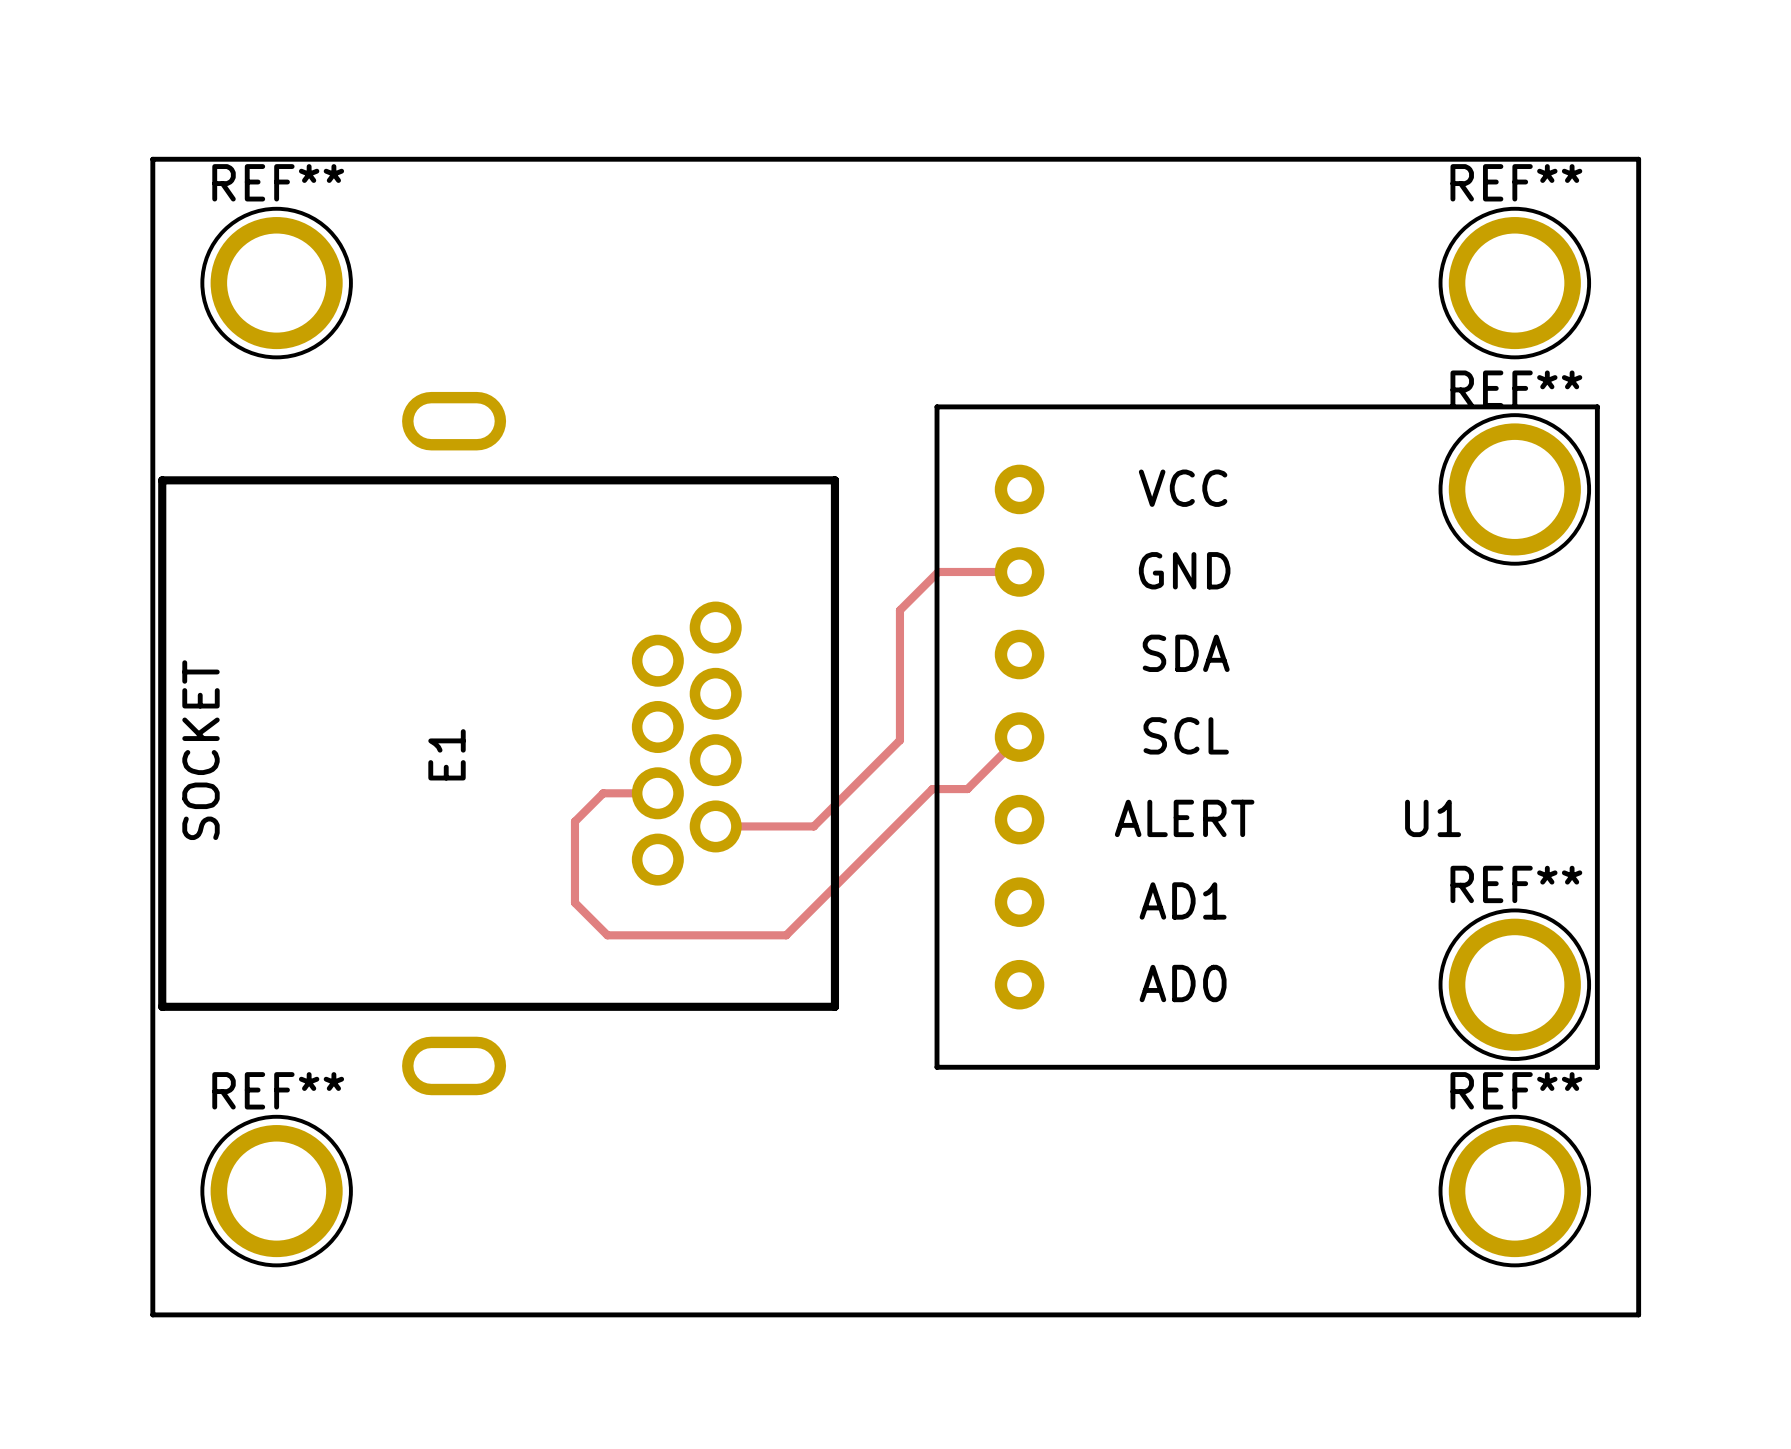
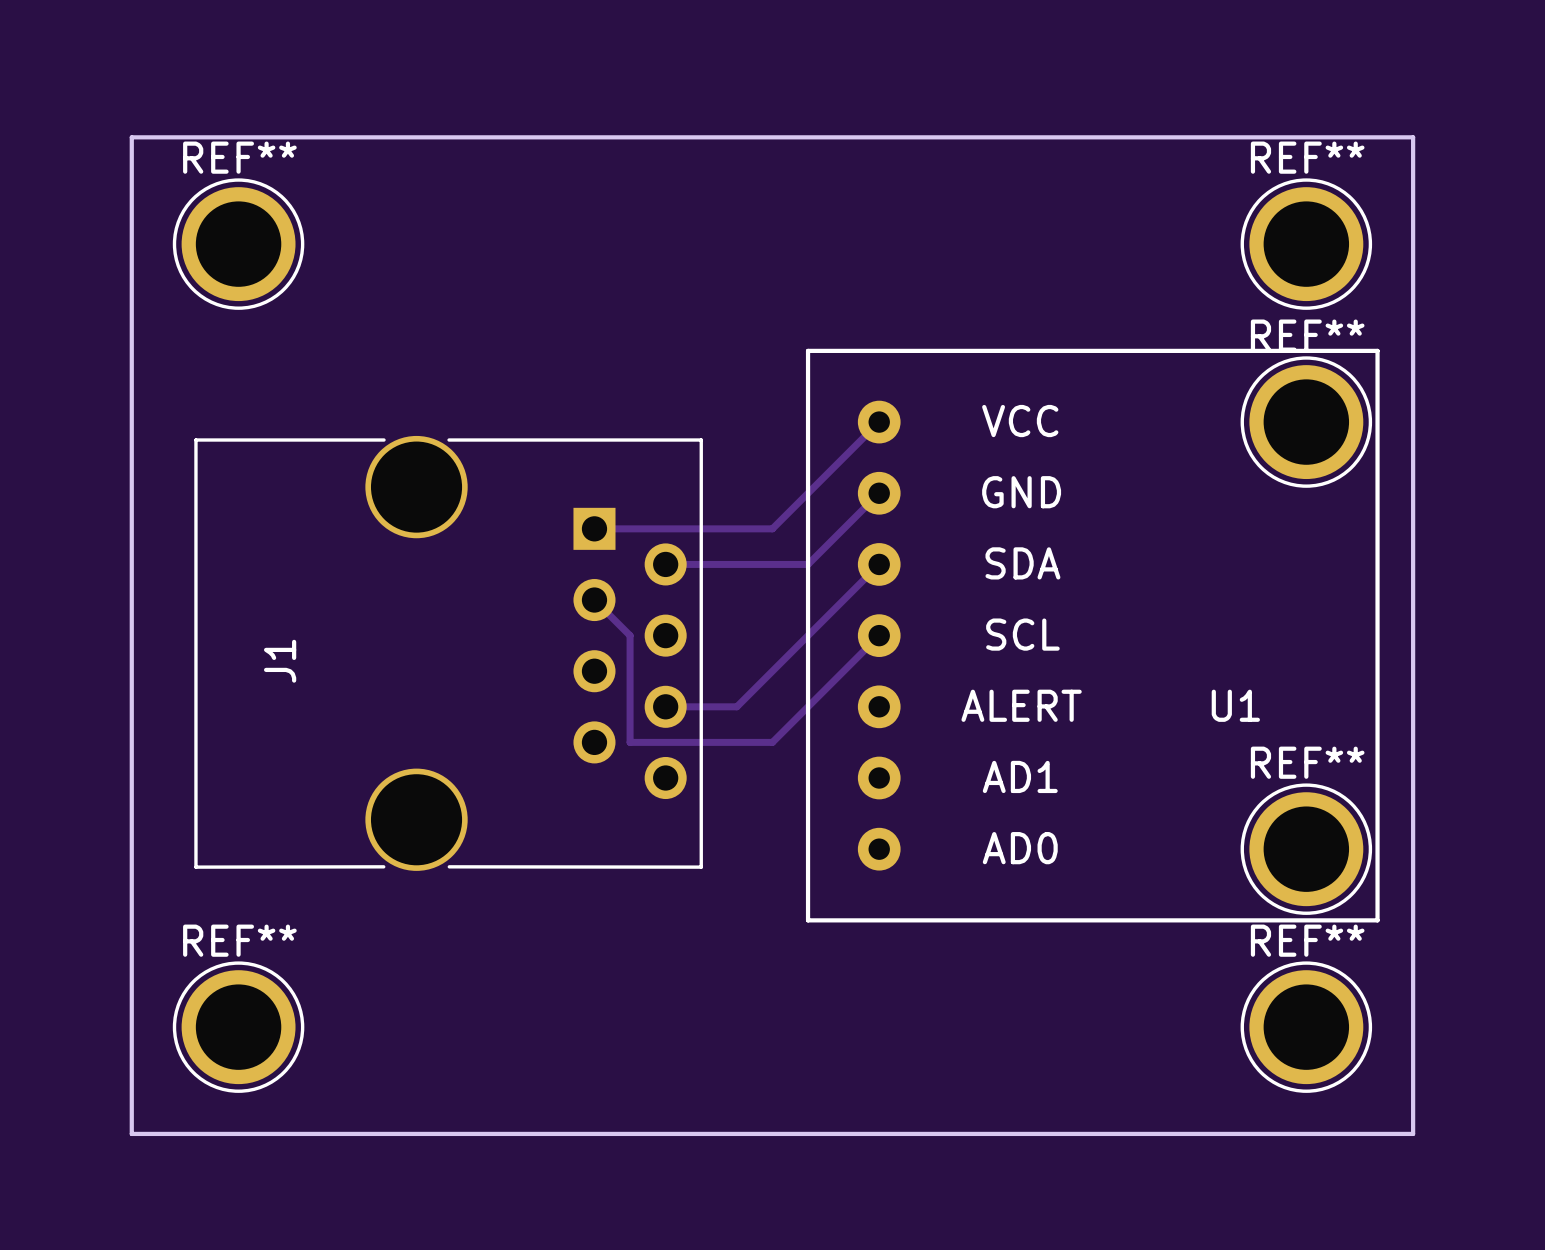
track: none -> (879, 422) (772, 528) (594, 528)
track: (1019, 571) (938, 571) (899, 610) (899, 740) (813, 826) (715, 826) -> (879, 493) (808, 564) (665, 564)
track: none -> (879, 564) (736, 706) (665, 706)
E1: (498, 743) -> none
J1: none -> (448, 653)
track: (967, 789) (932, 789) (786, 935) (607, 935) (574, 902) (574, 821) (603, 793) (657, 793) -> (834, 680) (772, 742) (630, 742) (630, 635) (594, 600)

